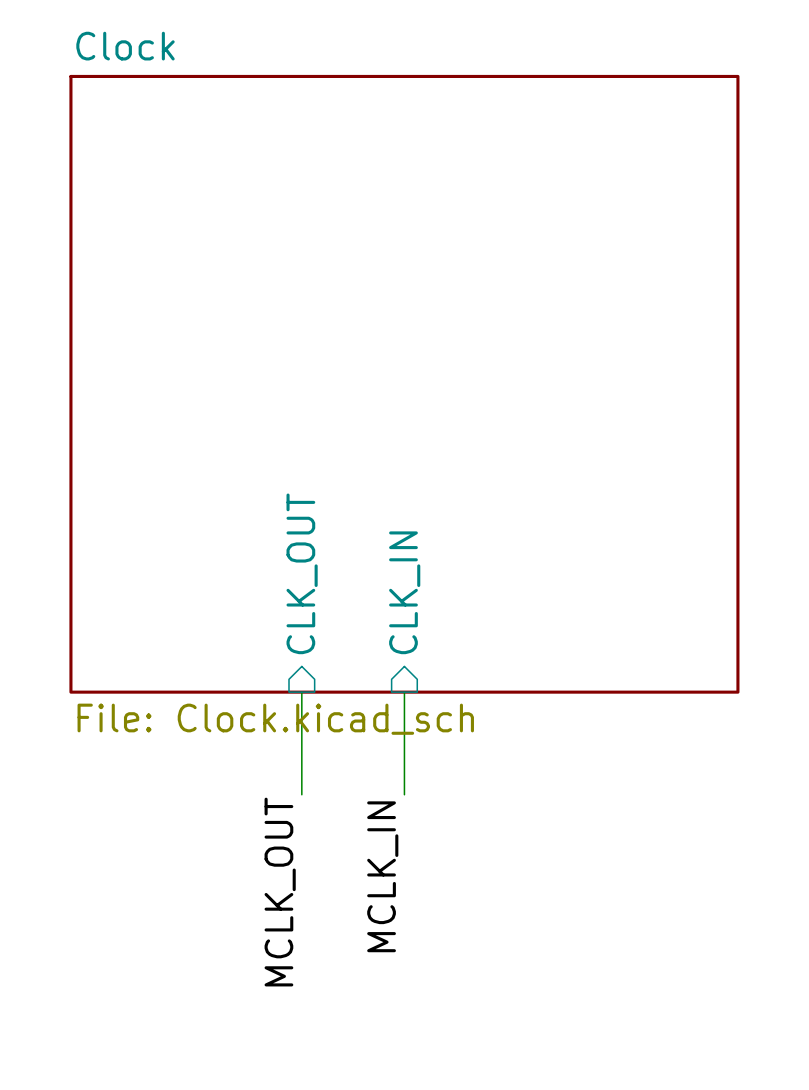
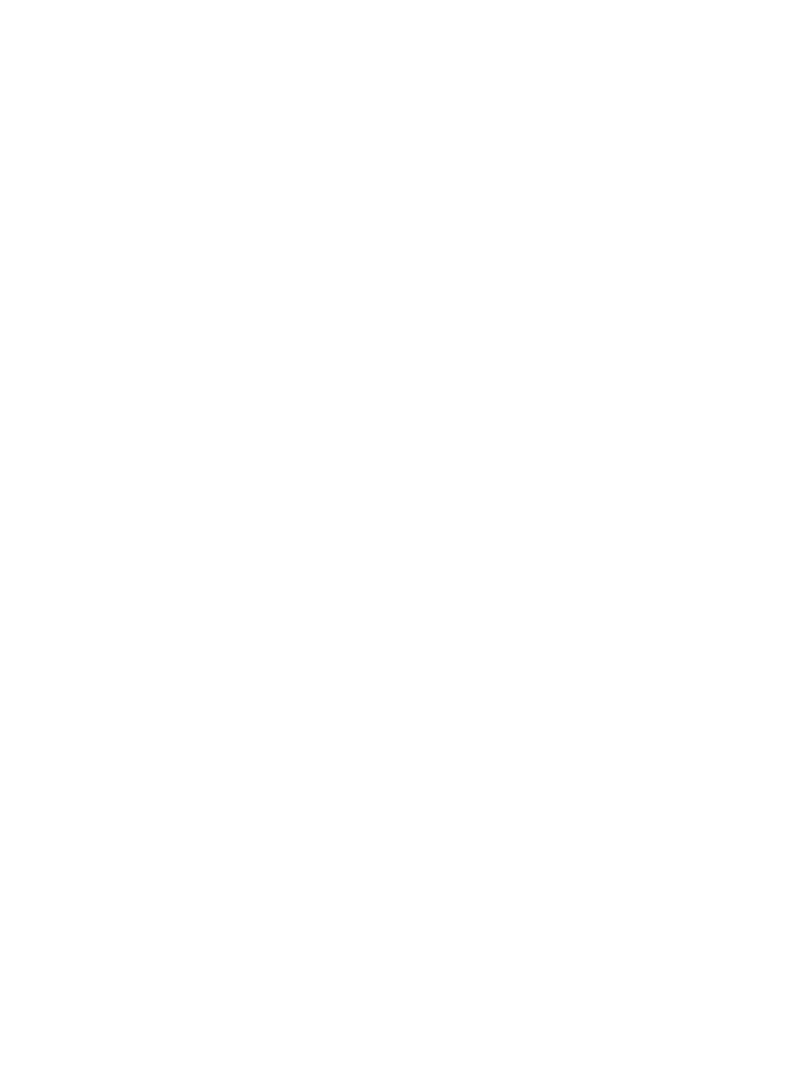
sheet Clock: File: Clock.kicad_sch (404, 384) -> none
sheet pin: CLK_OUT (302, 573) -> none
sheet pin: CLK_IN (404, 592) -> none
wire: (301, 692) (301, 794) -> none
wire: (404, 692) (404, 794) -> none
label: MCLK_IN (382, 876) -> none
label: MCLK_OUT (280, 892) -> none

